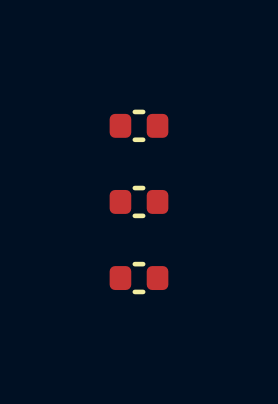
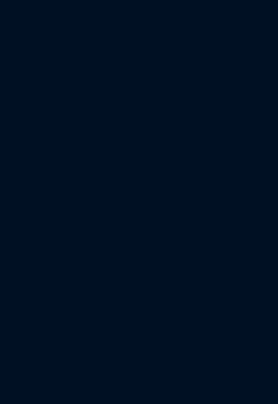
part: (138, 125) -> none
part: (138, 201) -> none
part: (138, 278) -> none

